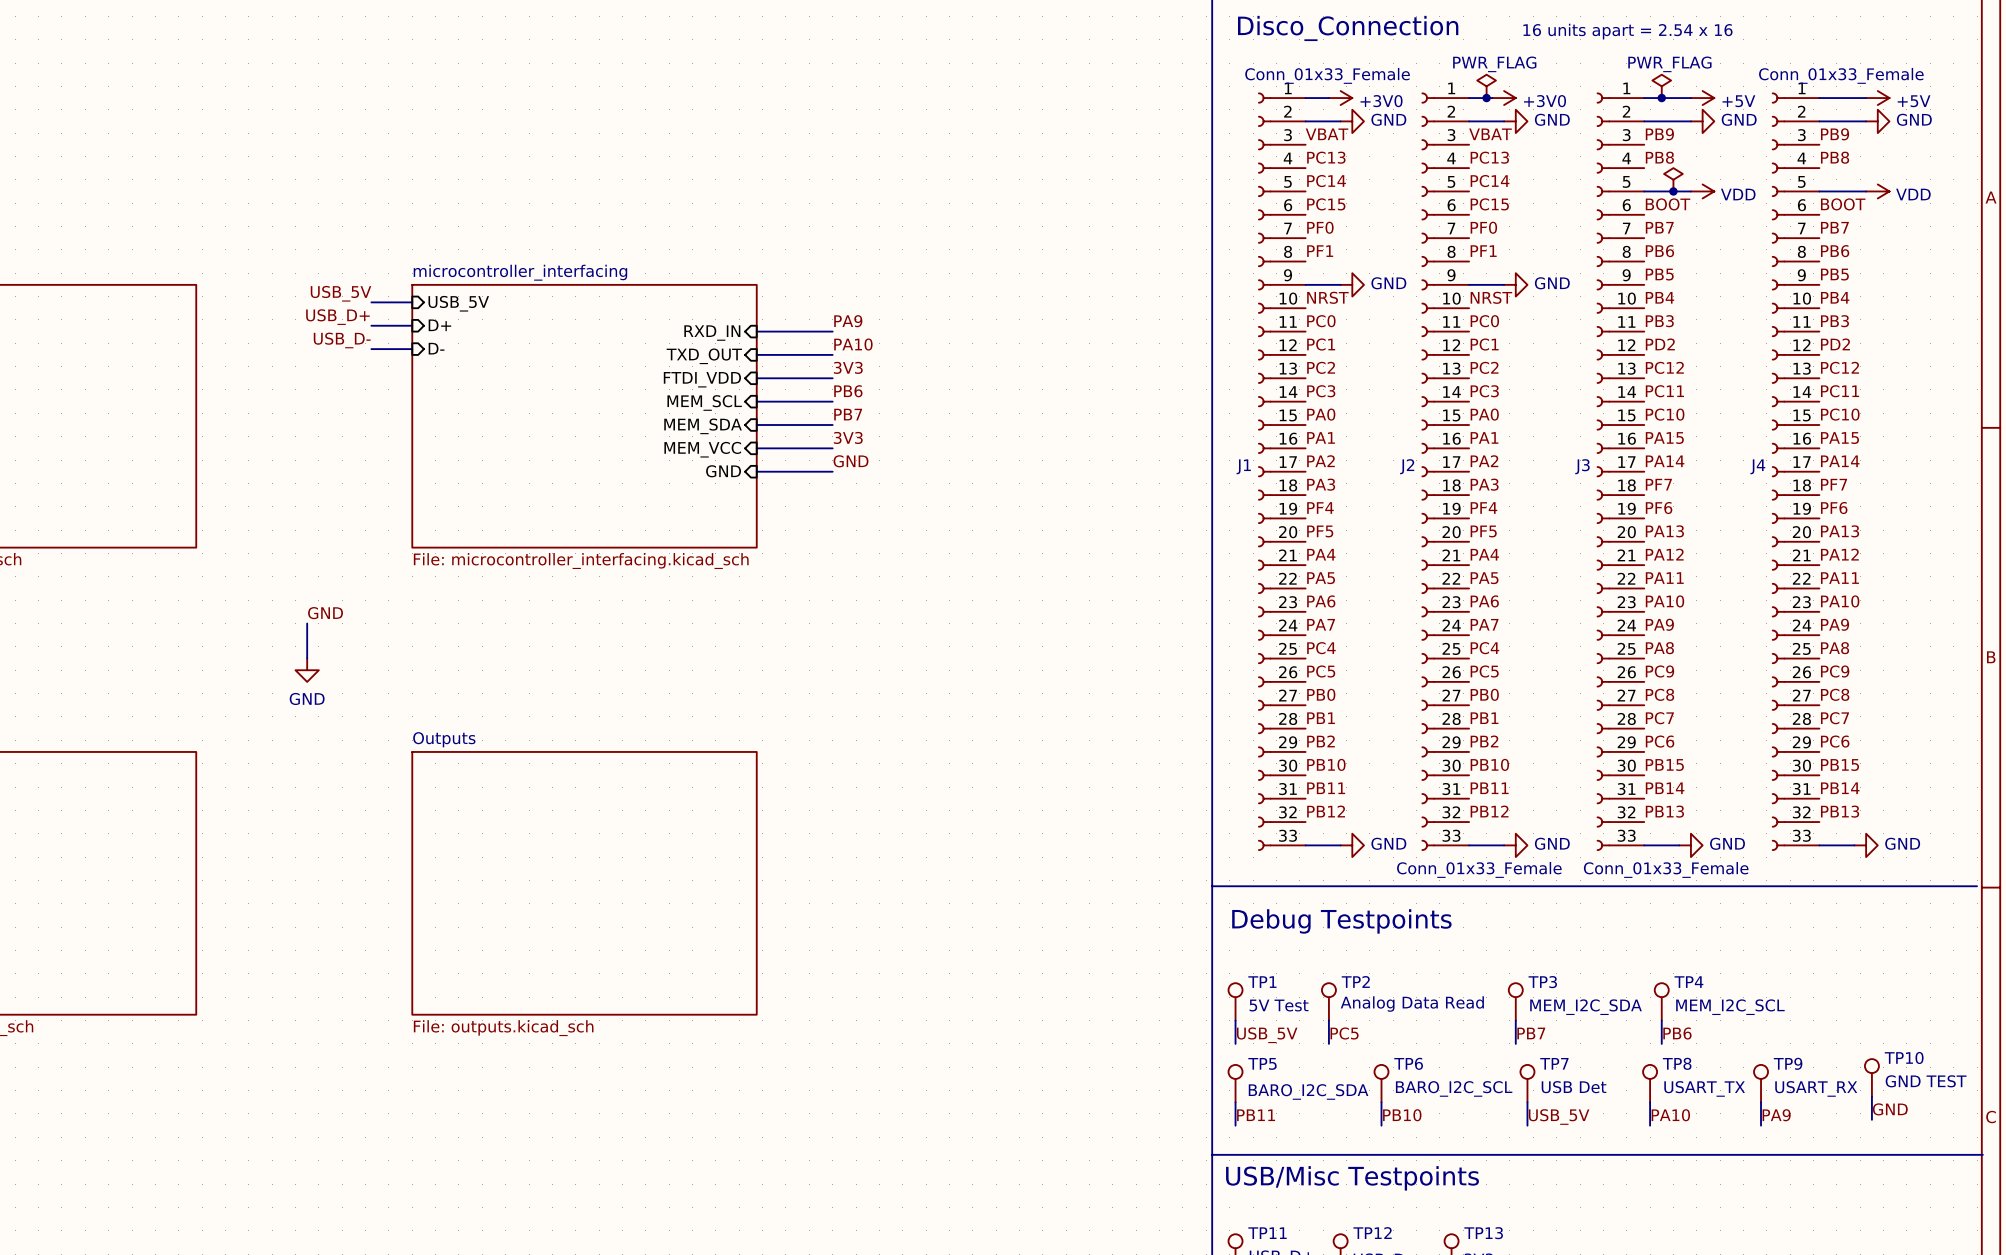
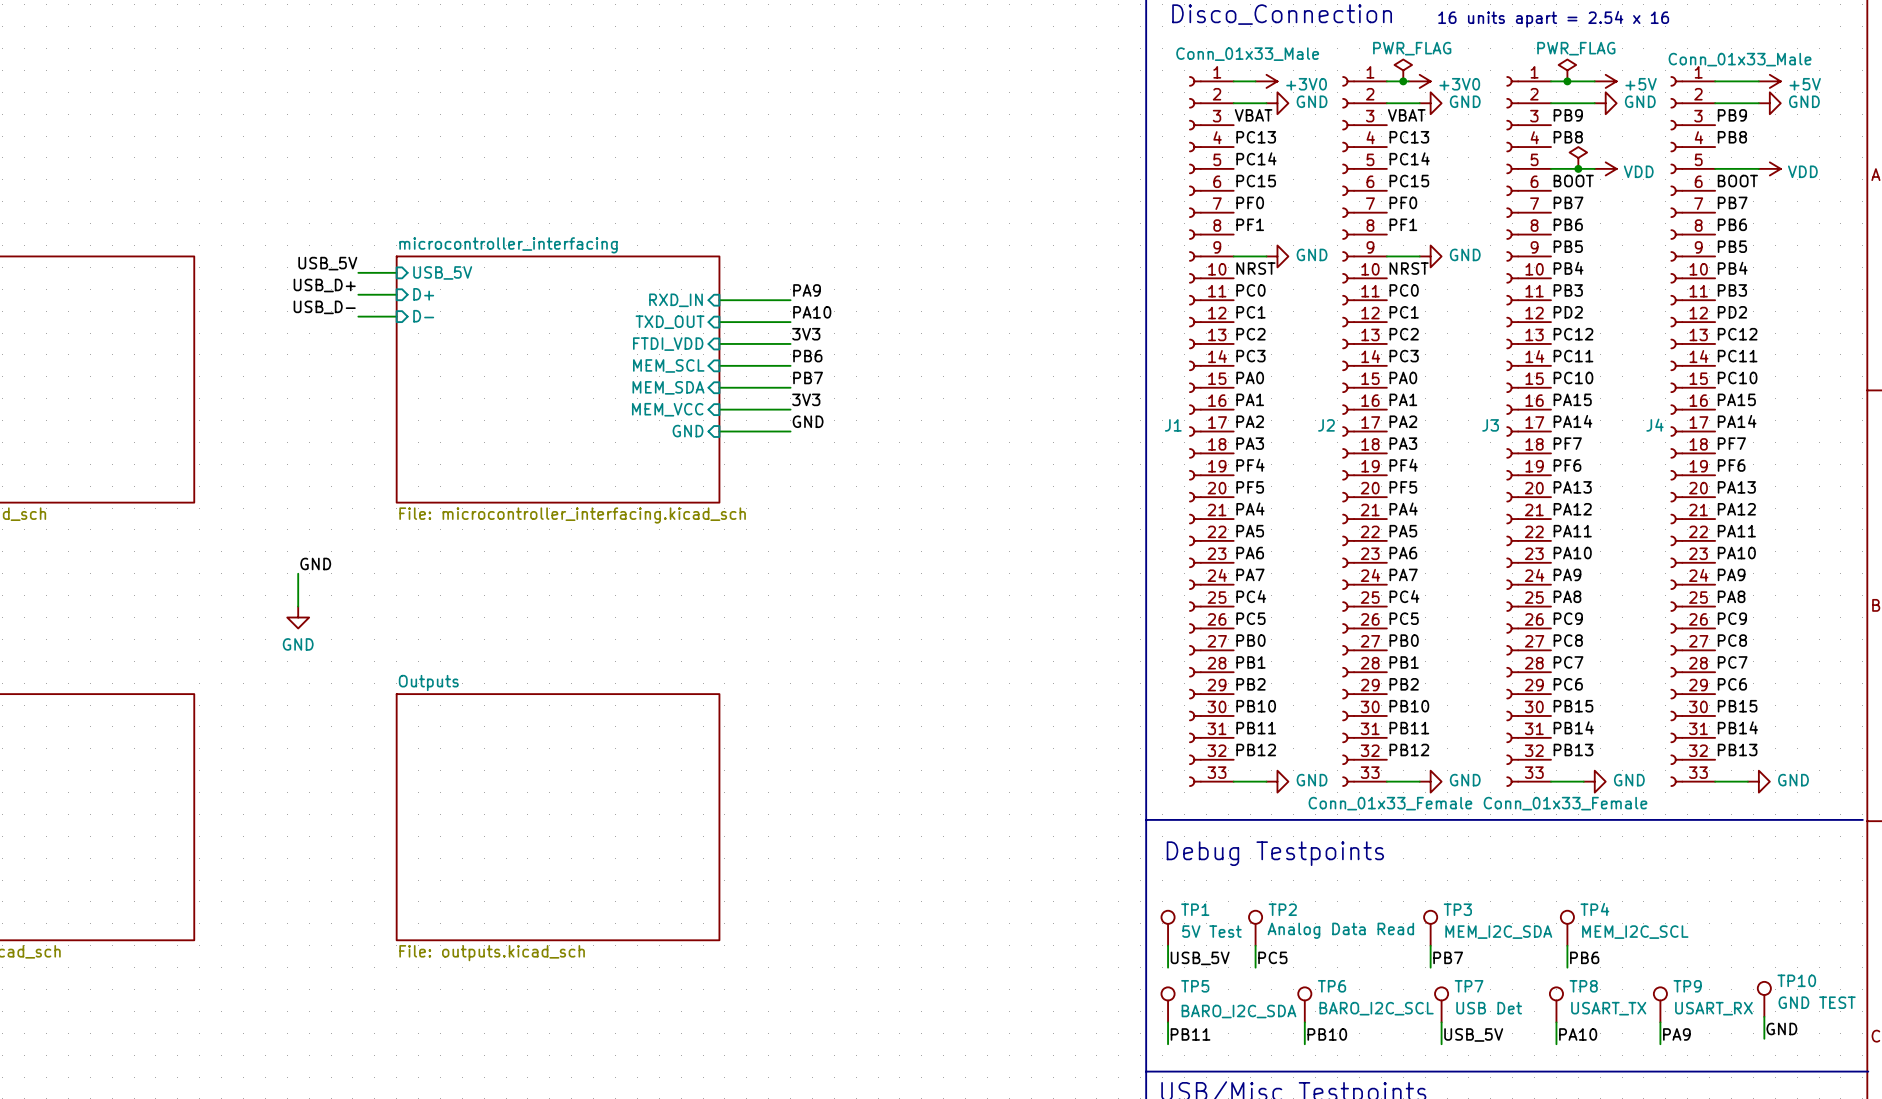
J1 value: Conn_01x33_Female (1327, 75) -> Conn_01x33_Male (1247, 54)
J4 value: Conn_01x33_Female (1841, 75) -> Conn_01x33_Male (1740, 59)

